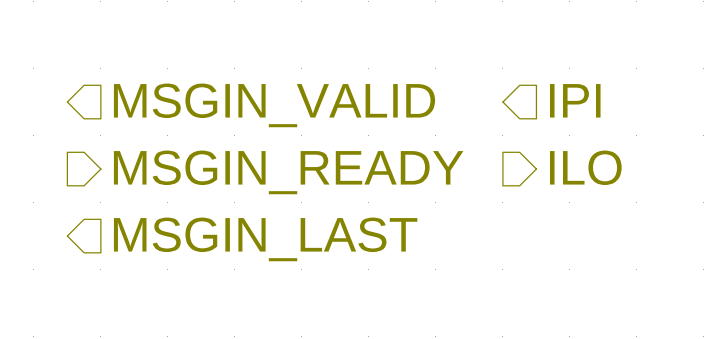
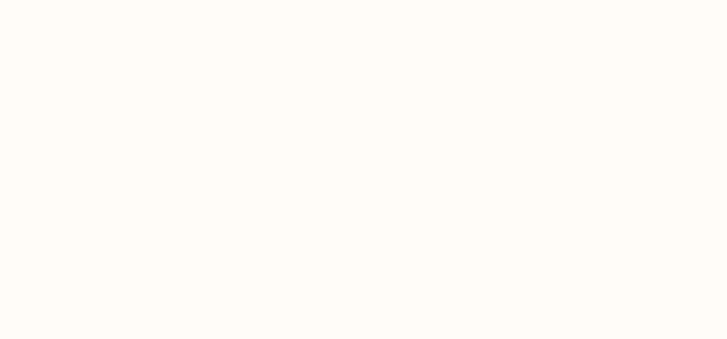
hierarchical label: IPI (575, 100) -> none
hierarchical label: MSGIN_VALID (274, 105) -> none
hierarchical label: ILO (585, 167) -> none
hierarchical label: MSGIN_READY (288, 172) -> none
hierarchical label: MSGIN_LAST (265, 239) -> none

